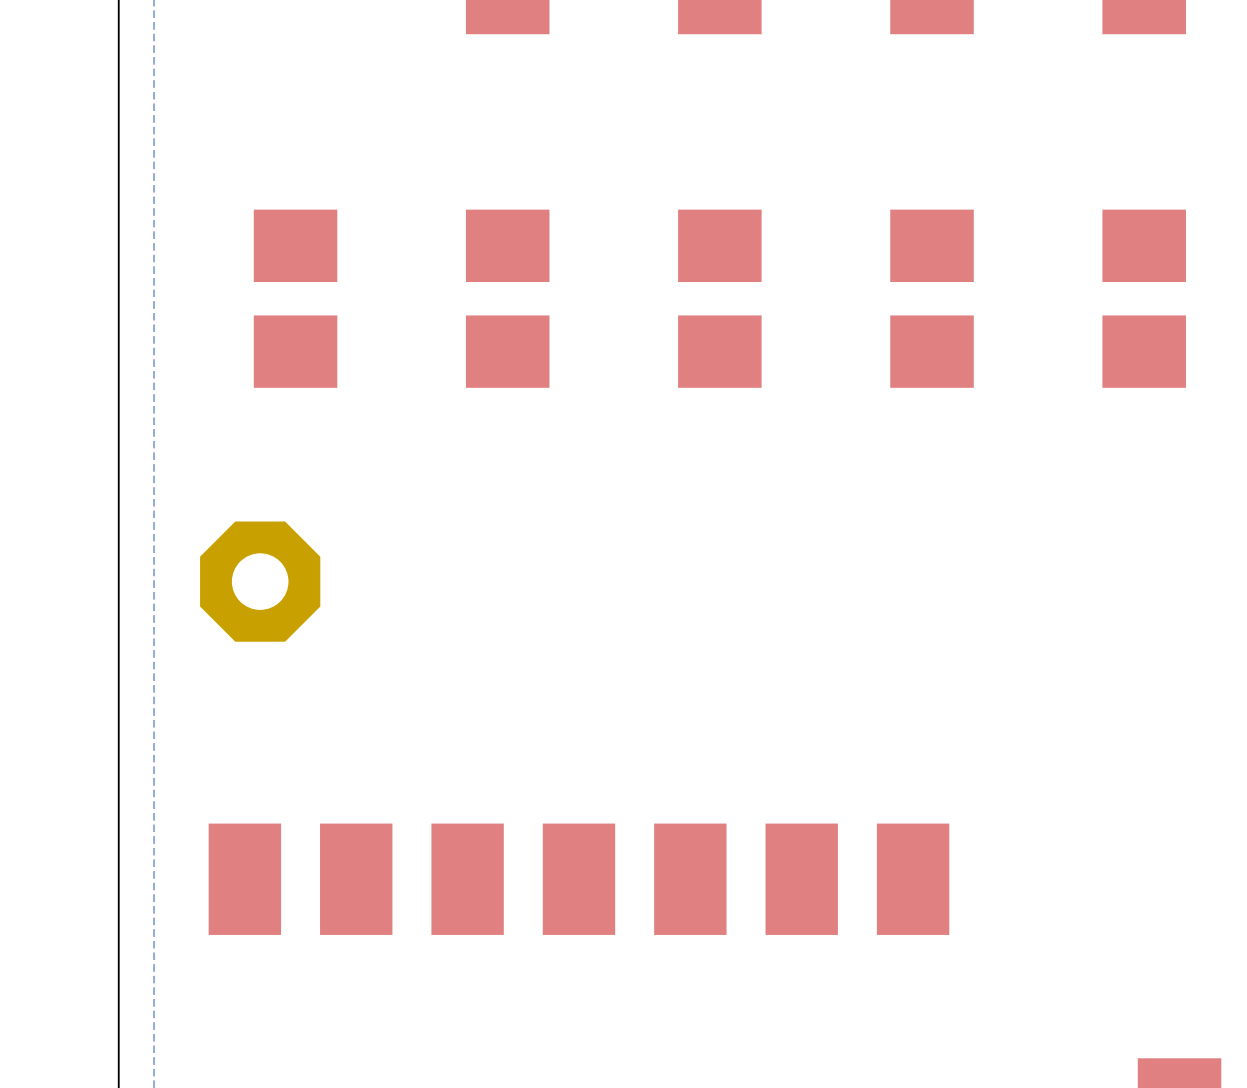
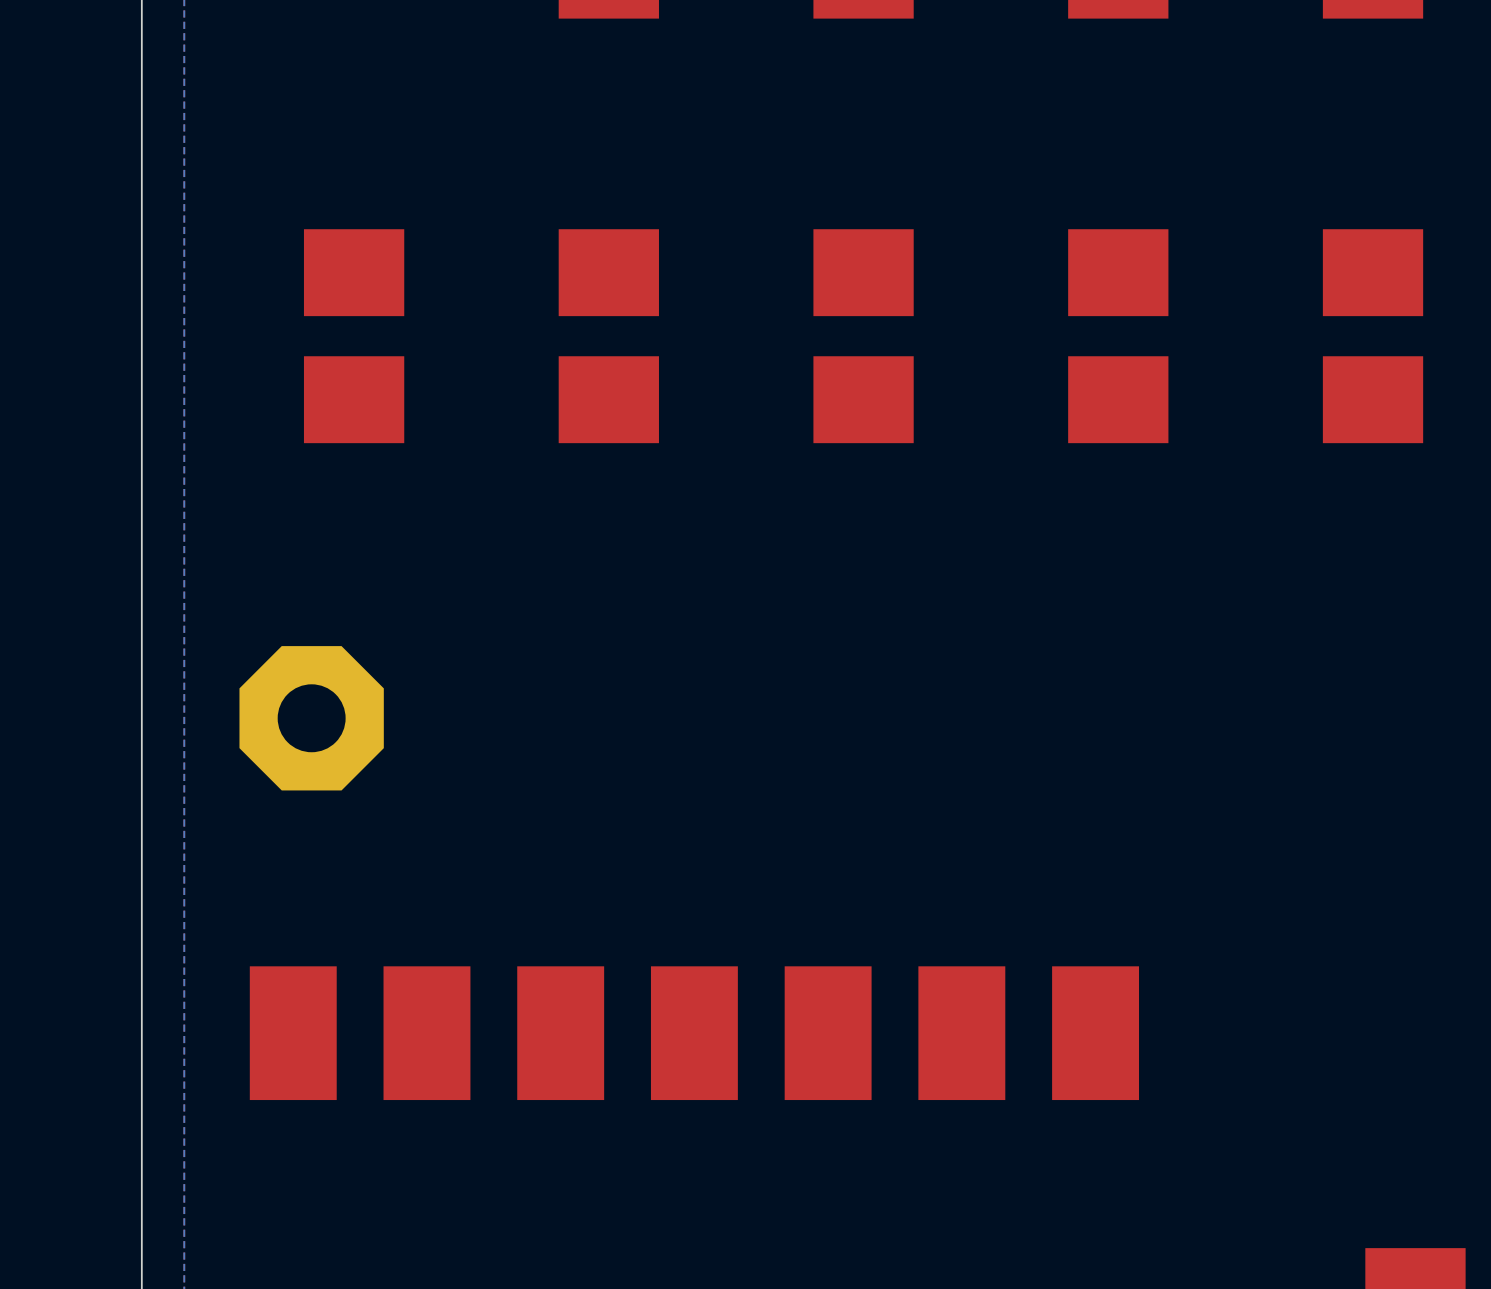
part position: (260, 581) -> (311, 718)

